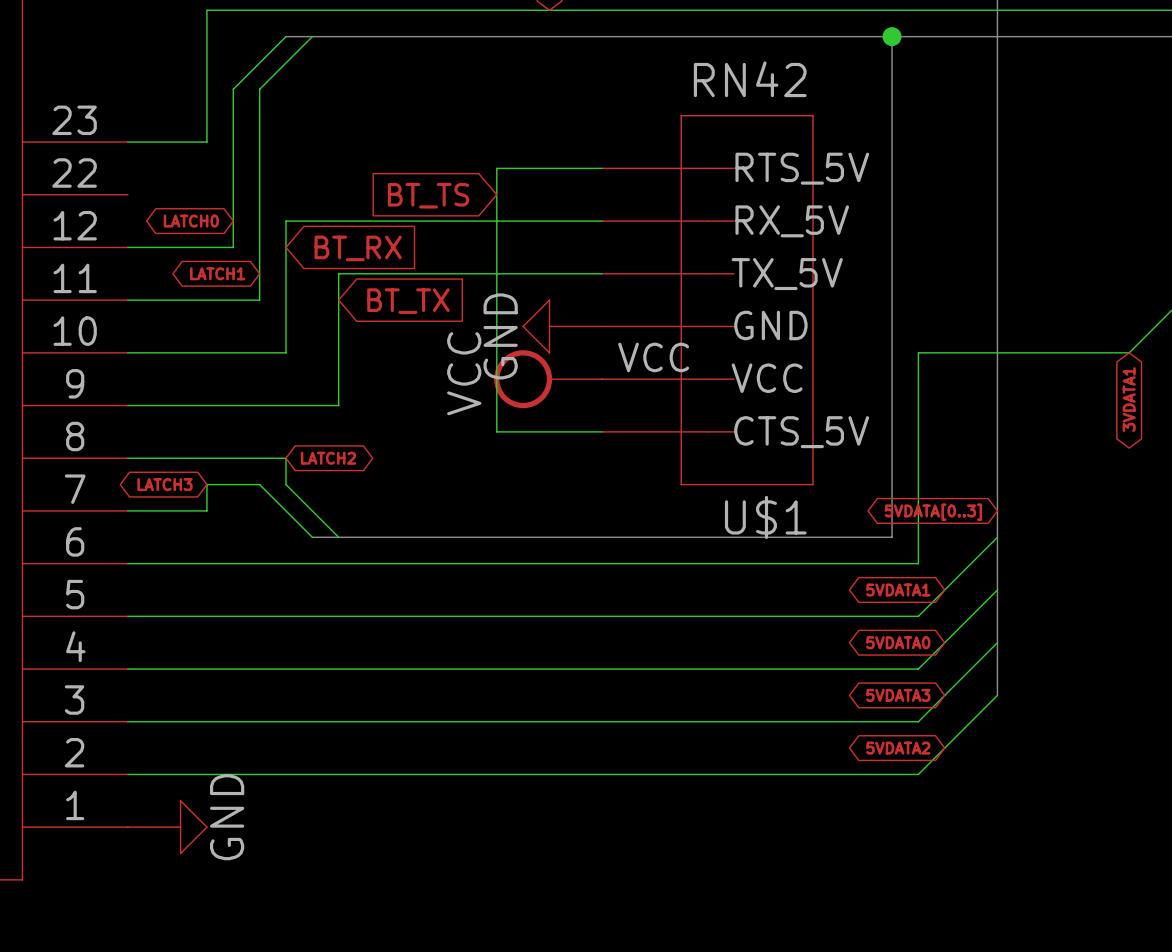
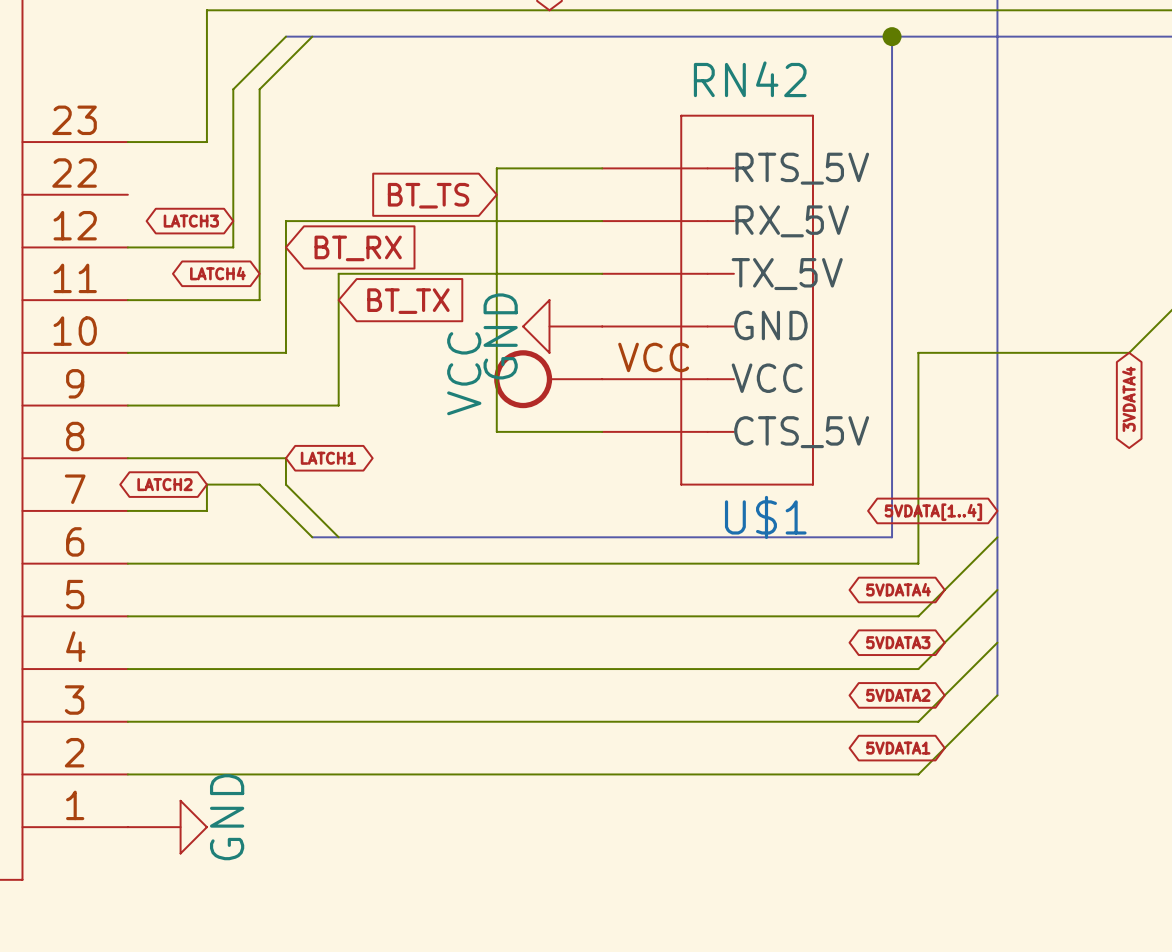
global label: LATCH0 (191, 221) -> LATCH3 (191, 221)
global label: LATCH1 (217, 273) -> LATCH4 (217, 273)
global label: 3VDATA1 (1129, 399) -> 3VDATA4 (1128, 399)
global label: LATCH2 (328, 458) -> LATCH1 (328, 458)
global label: LATCH3 (164, 484) -> LATCH2 (164, 484)
global label: 5VDATA[0..3] (933, 512) -> 5VDATA[1..4] (933, 512)
global label: 5VDATA1 (898, 589) -> 5VDATA4 (898, 589)
global label: 5VDATA0 (898, 642) -> 5VDATA3 (898, 642)
global label: 5VDATA3 (898, 695) -> 5VDATA2 (898, 695)
global label: 5VDATA2 (898, 748) -> 5VDATA1 (898, 748)

